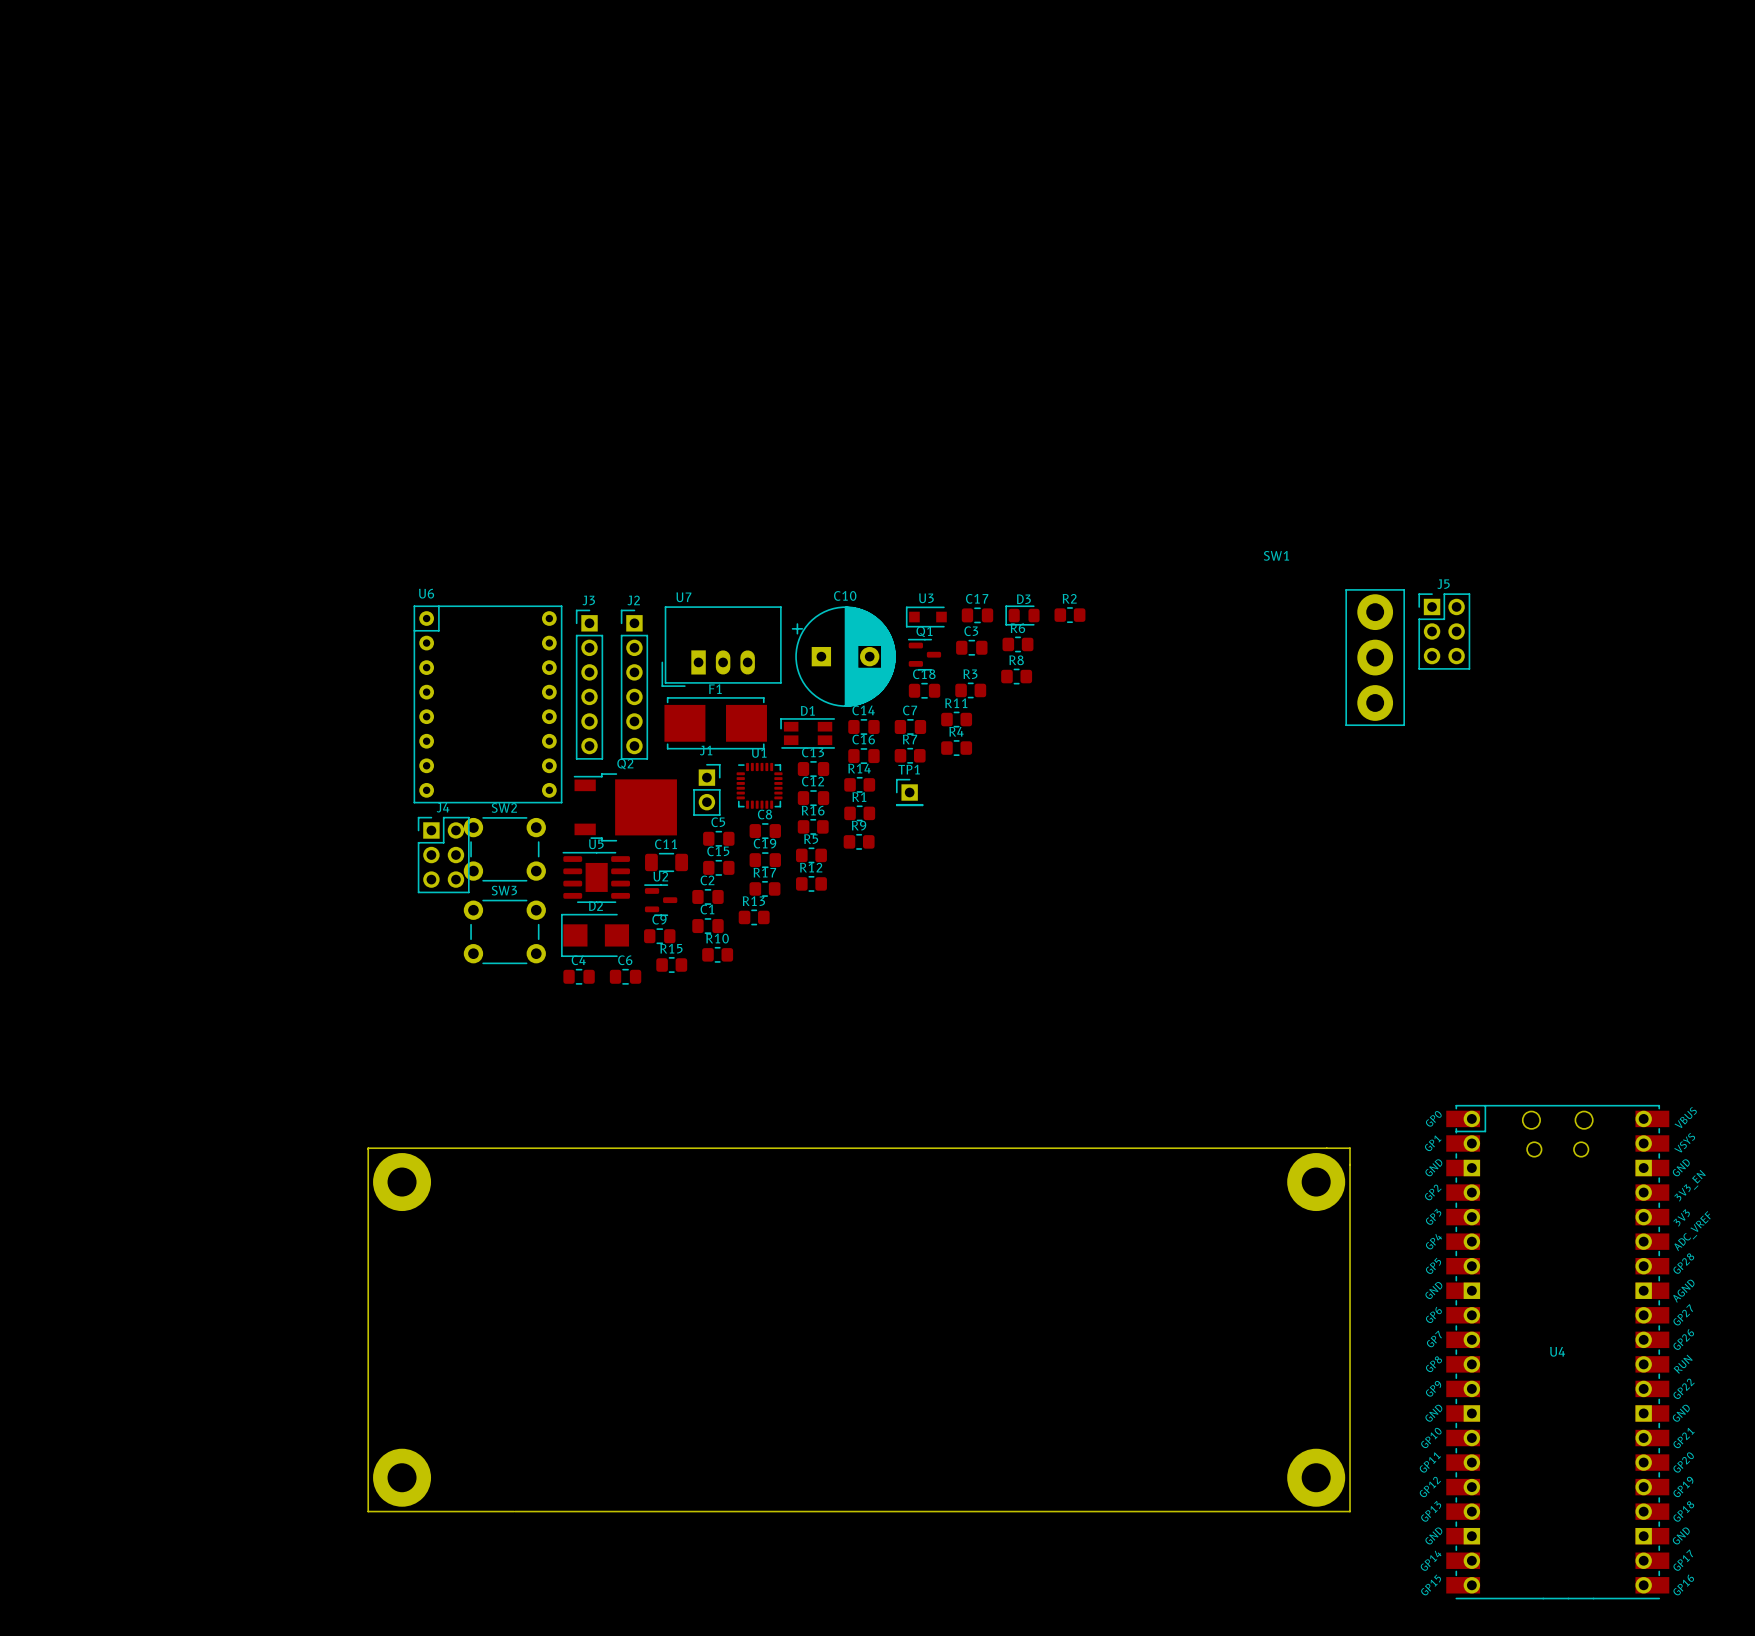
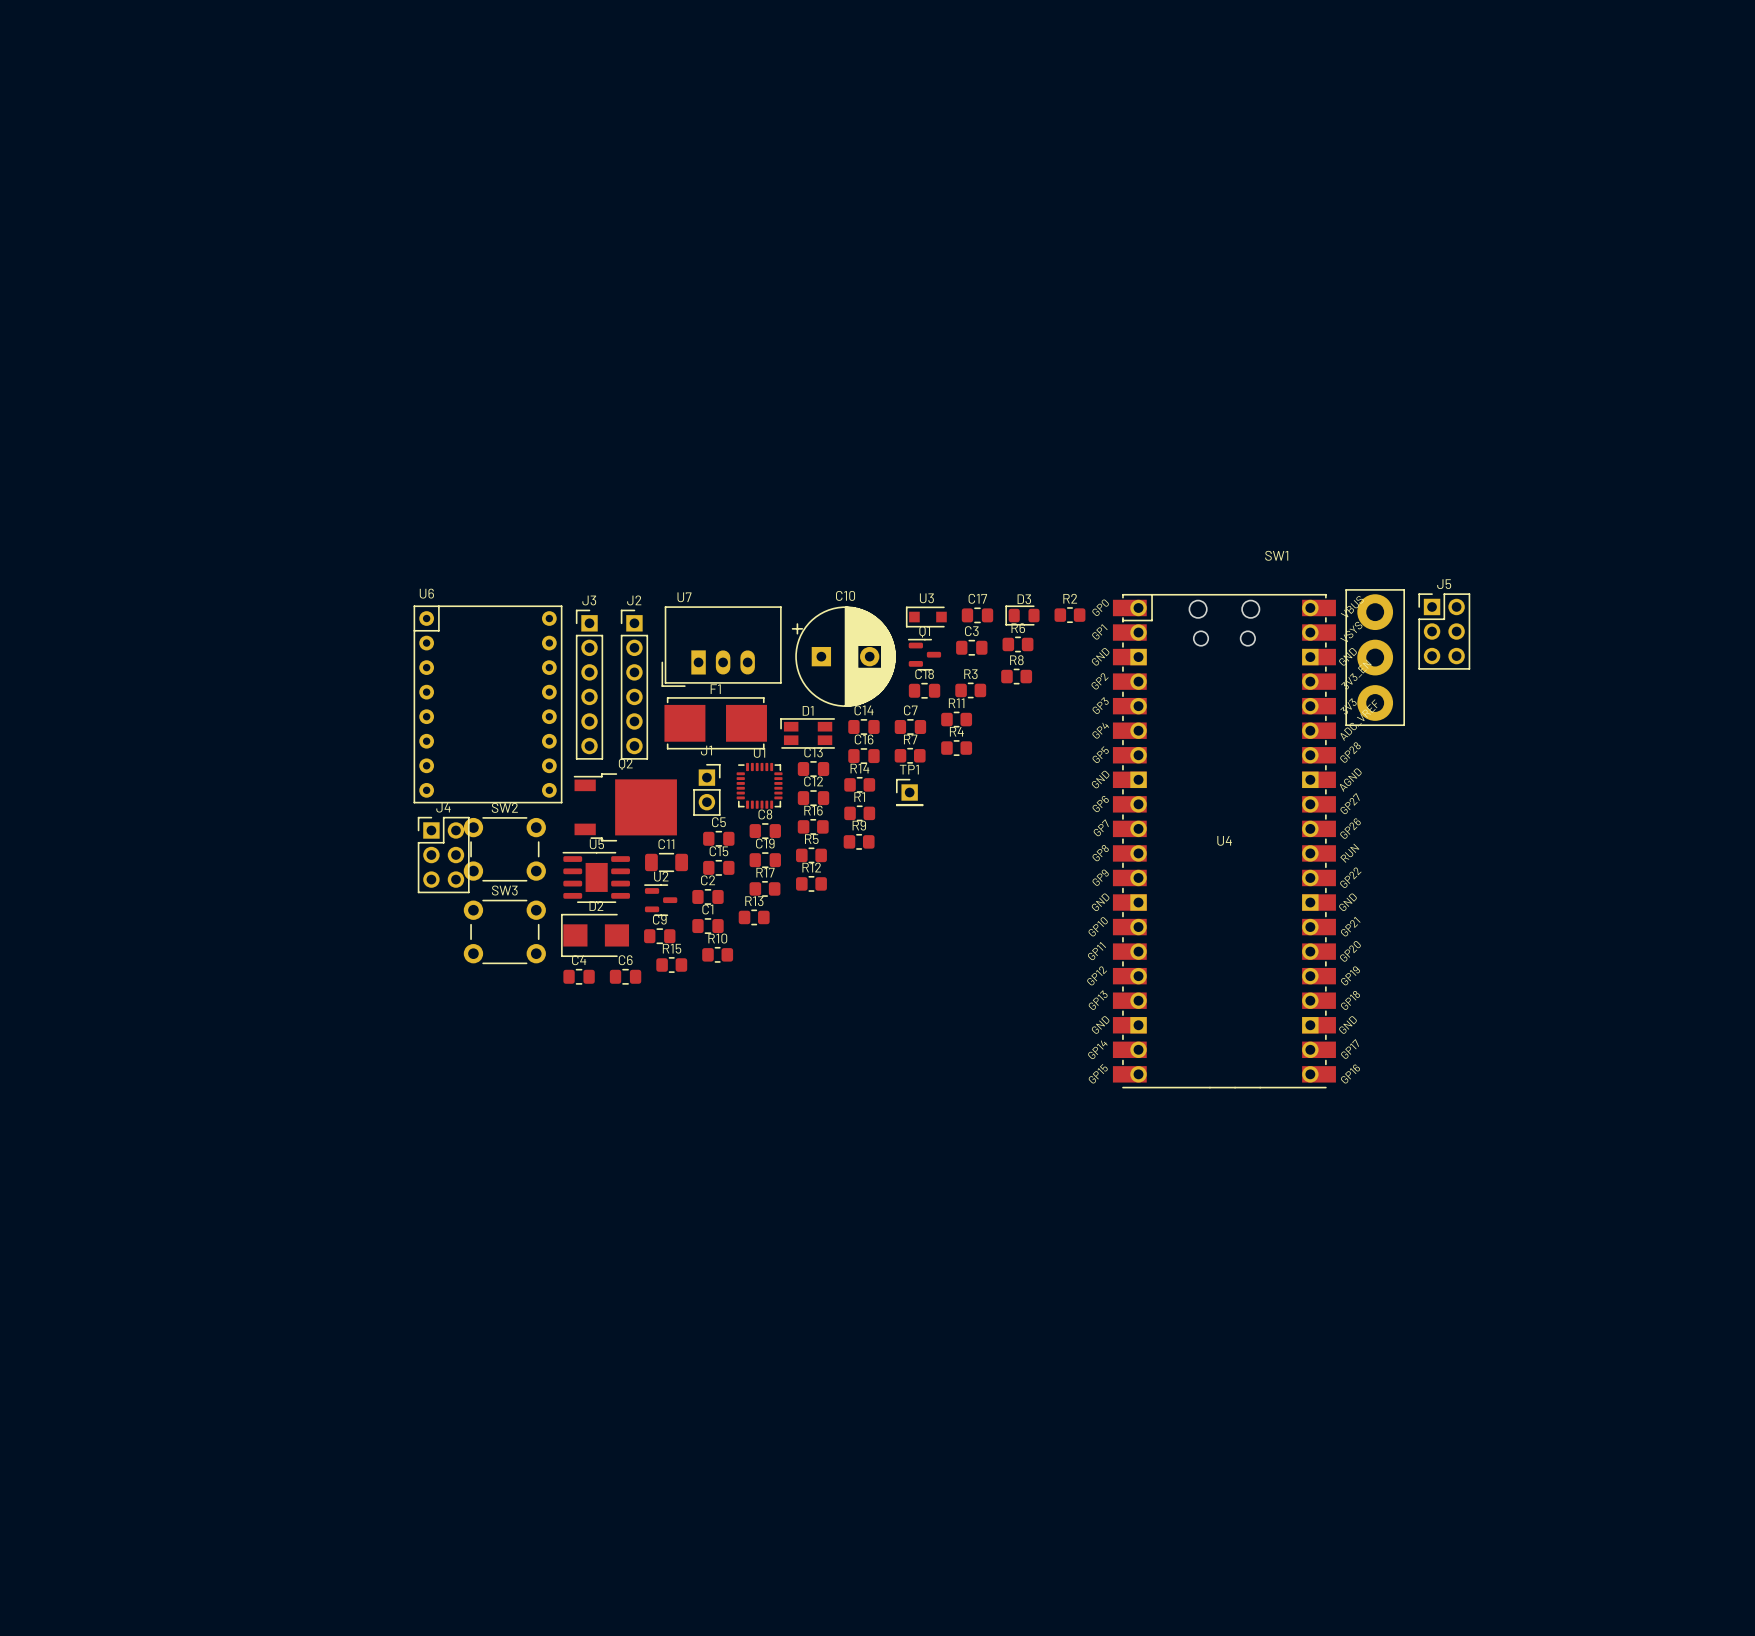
part: (402, 1182) -> none
part: (1316, 1182) -> none
U4 position: (1557, 1352) -> (1224, 841)
part: (402, 1477) -> none
part: (1316, 1477) -> none
board edge: (514, 1511) (368, 1511) (368, 1148) (1350, 1148) (1350, 1511) (515, 1511) -> none

